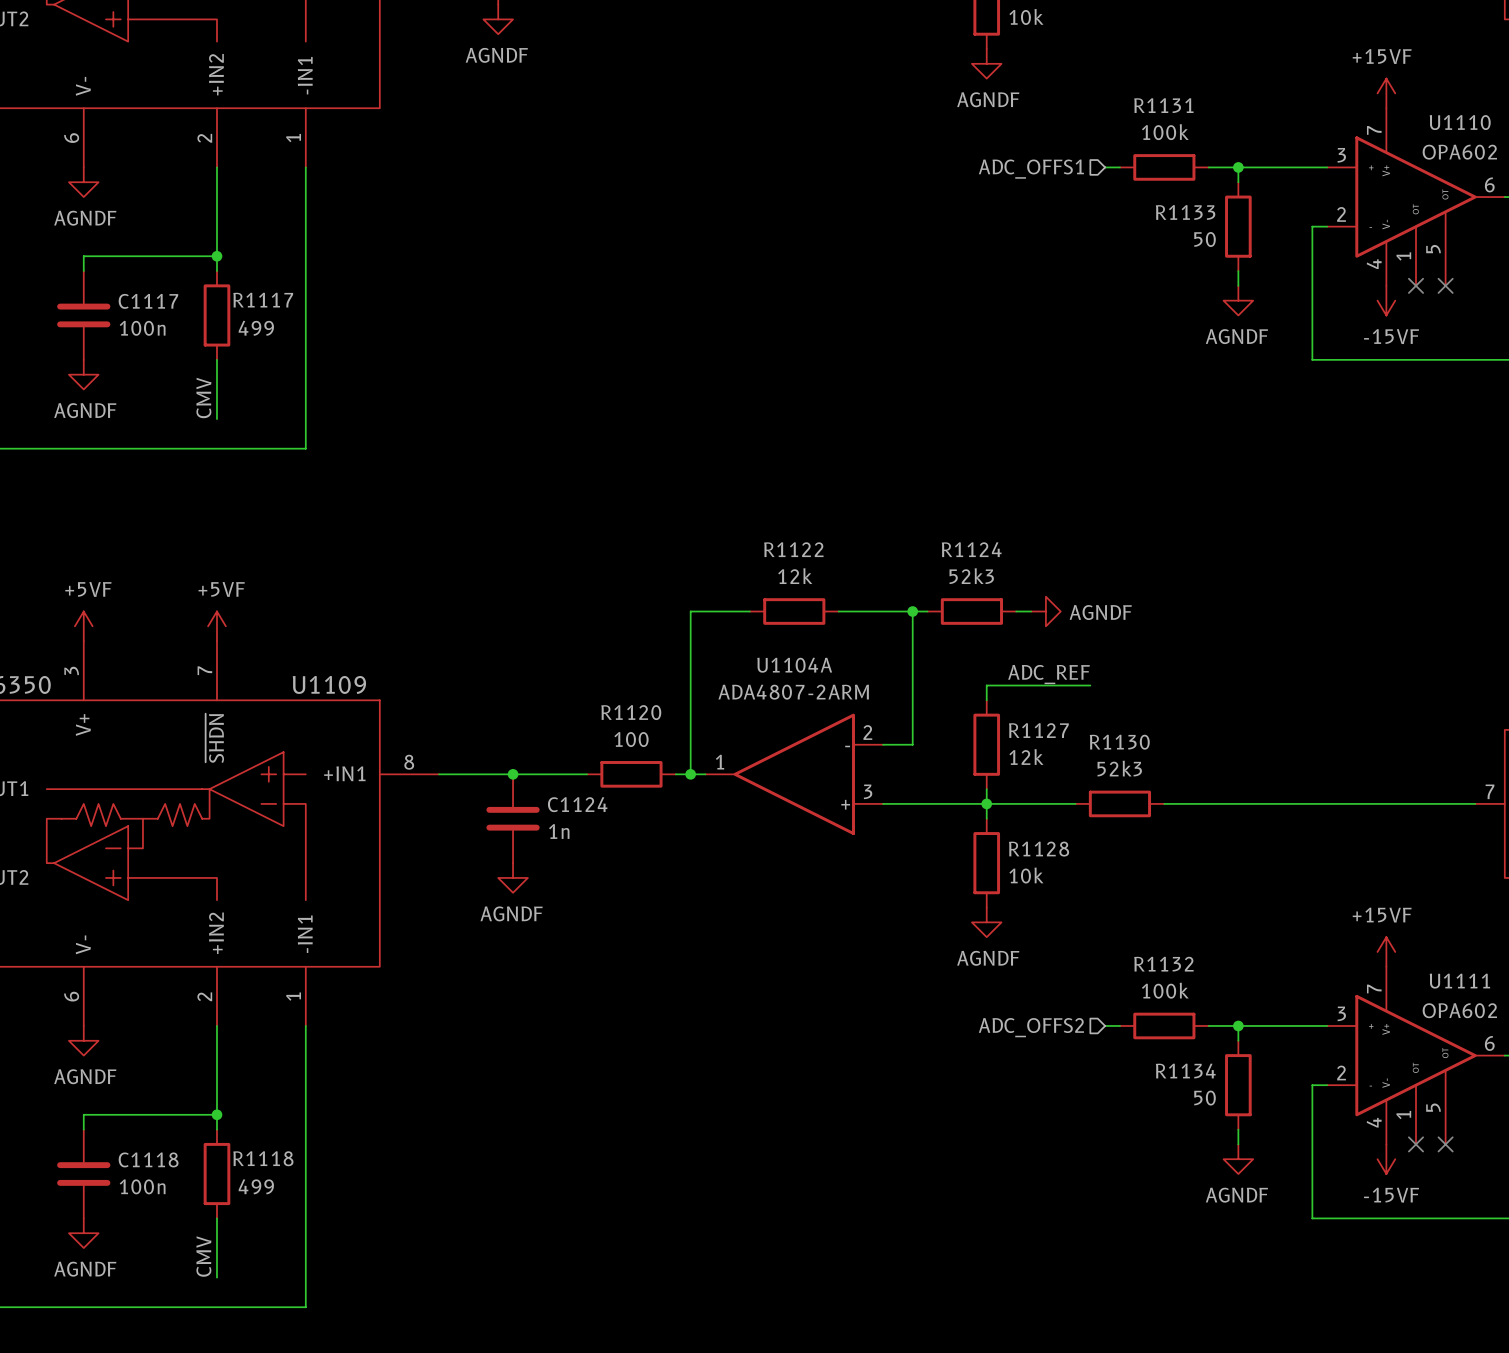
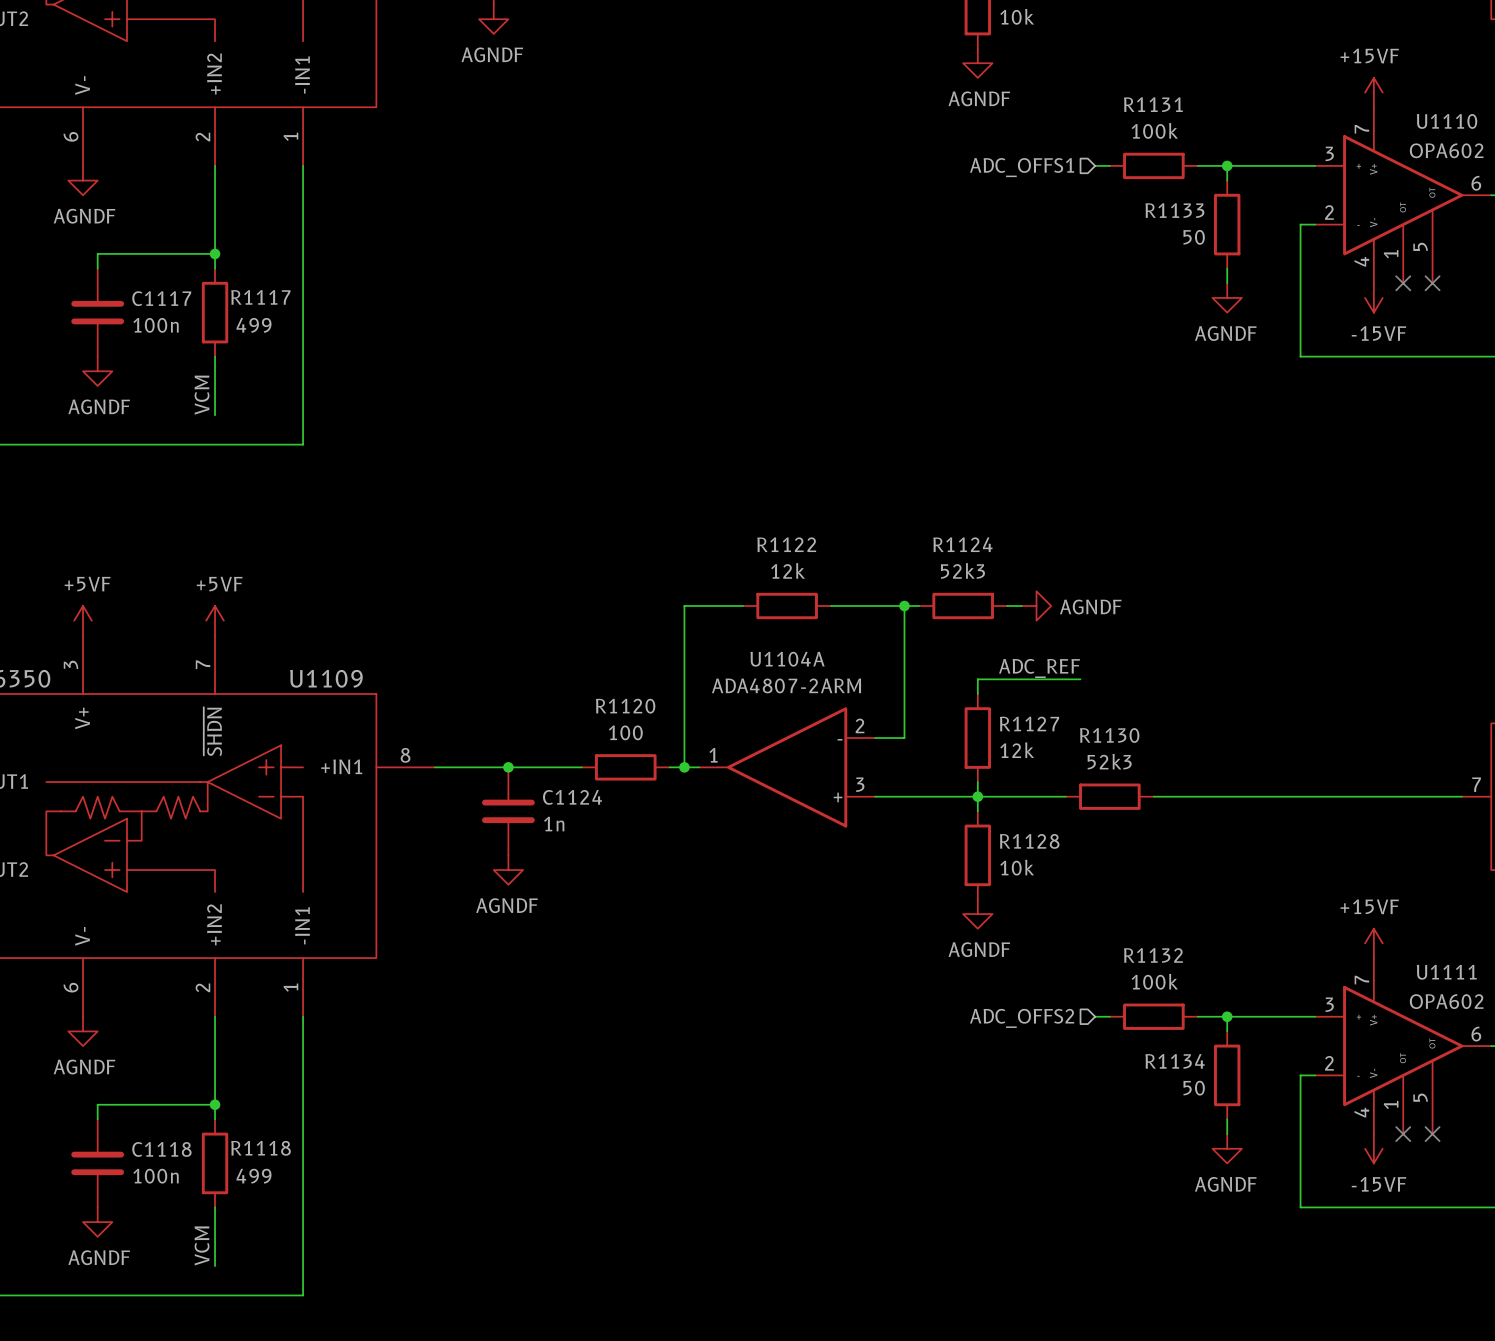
wire: (98, 256) (83, 256) (83, 271) -> (97, 253) (97, 268)
C1117 position: (83, 315) -> (97, 312)
power symbol position: AGNDF (83, 374) -> AGNDF (97, 371)
label: CMV (203, 398) -> VCM (202, 395)
wire: (98, 1114) (83, 1114) (83, 1129) -> (97, 1104) (97, 1119)
C1118 position: (83, 1174) -> (97, 1163)
power symbol position: AGNDF (83, 1233) -> AGNDF (97, 1222)
label: CMV (203, 1256) -> VCM (202, 1245)

